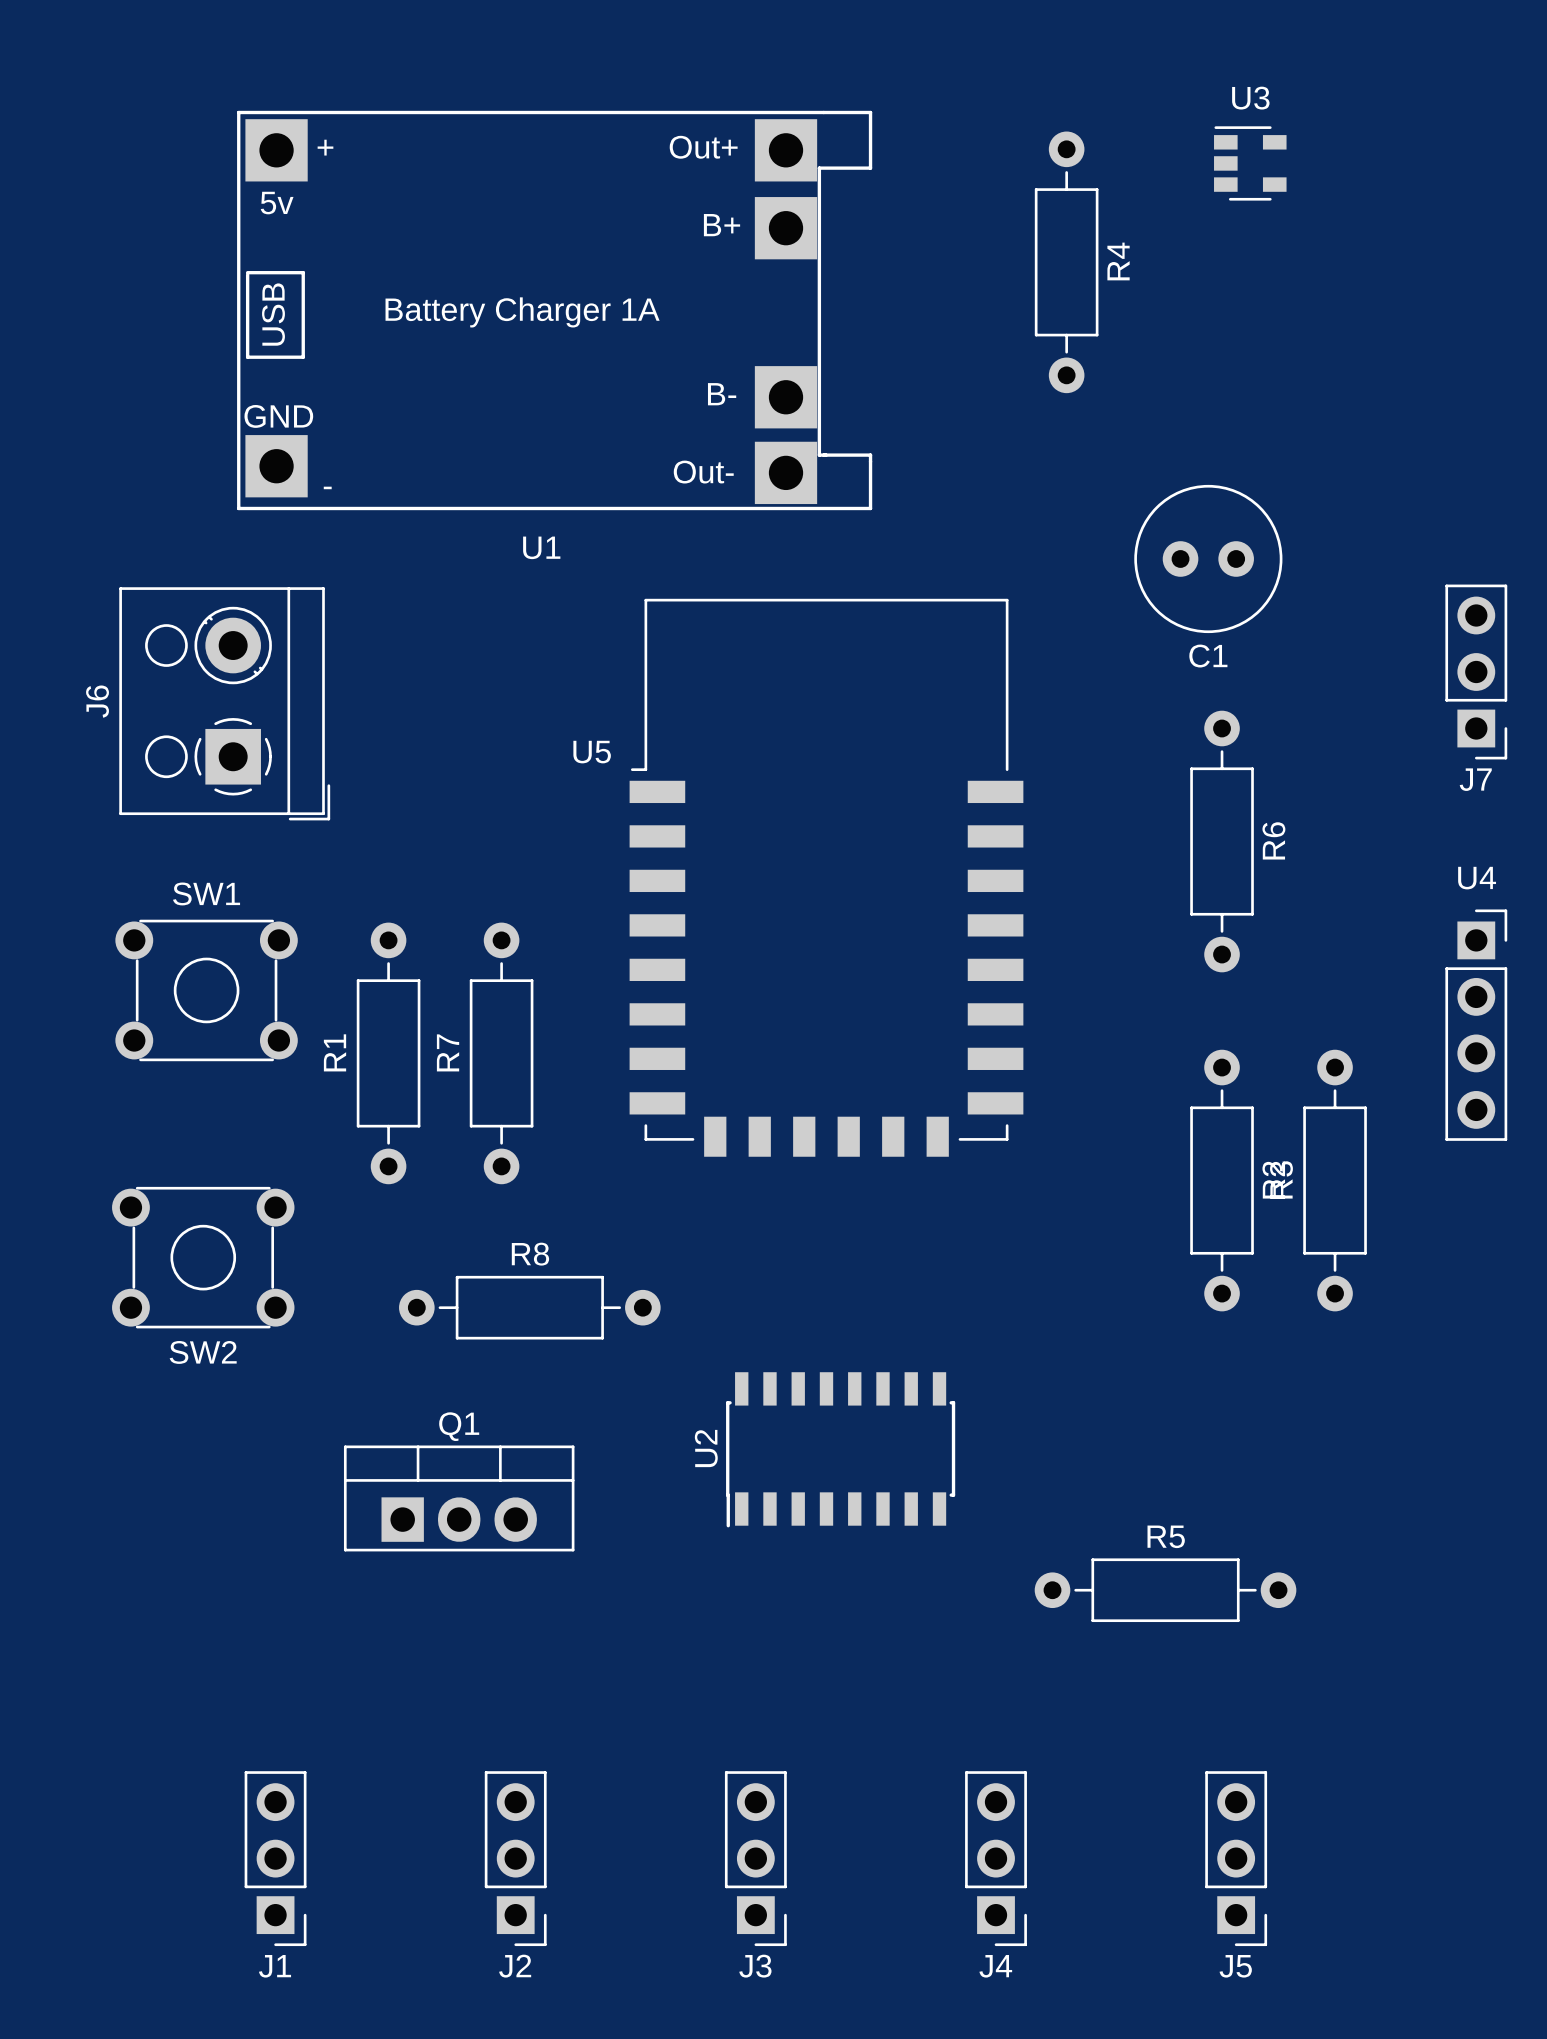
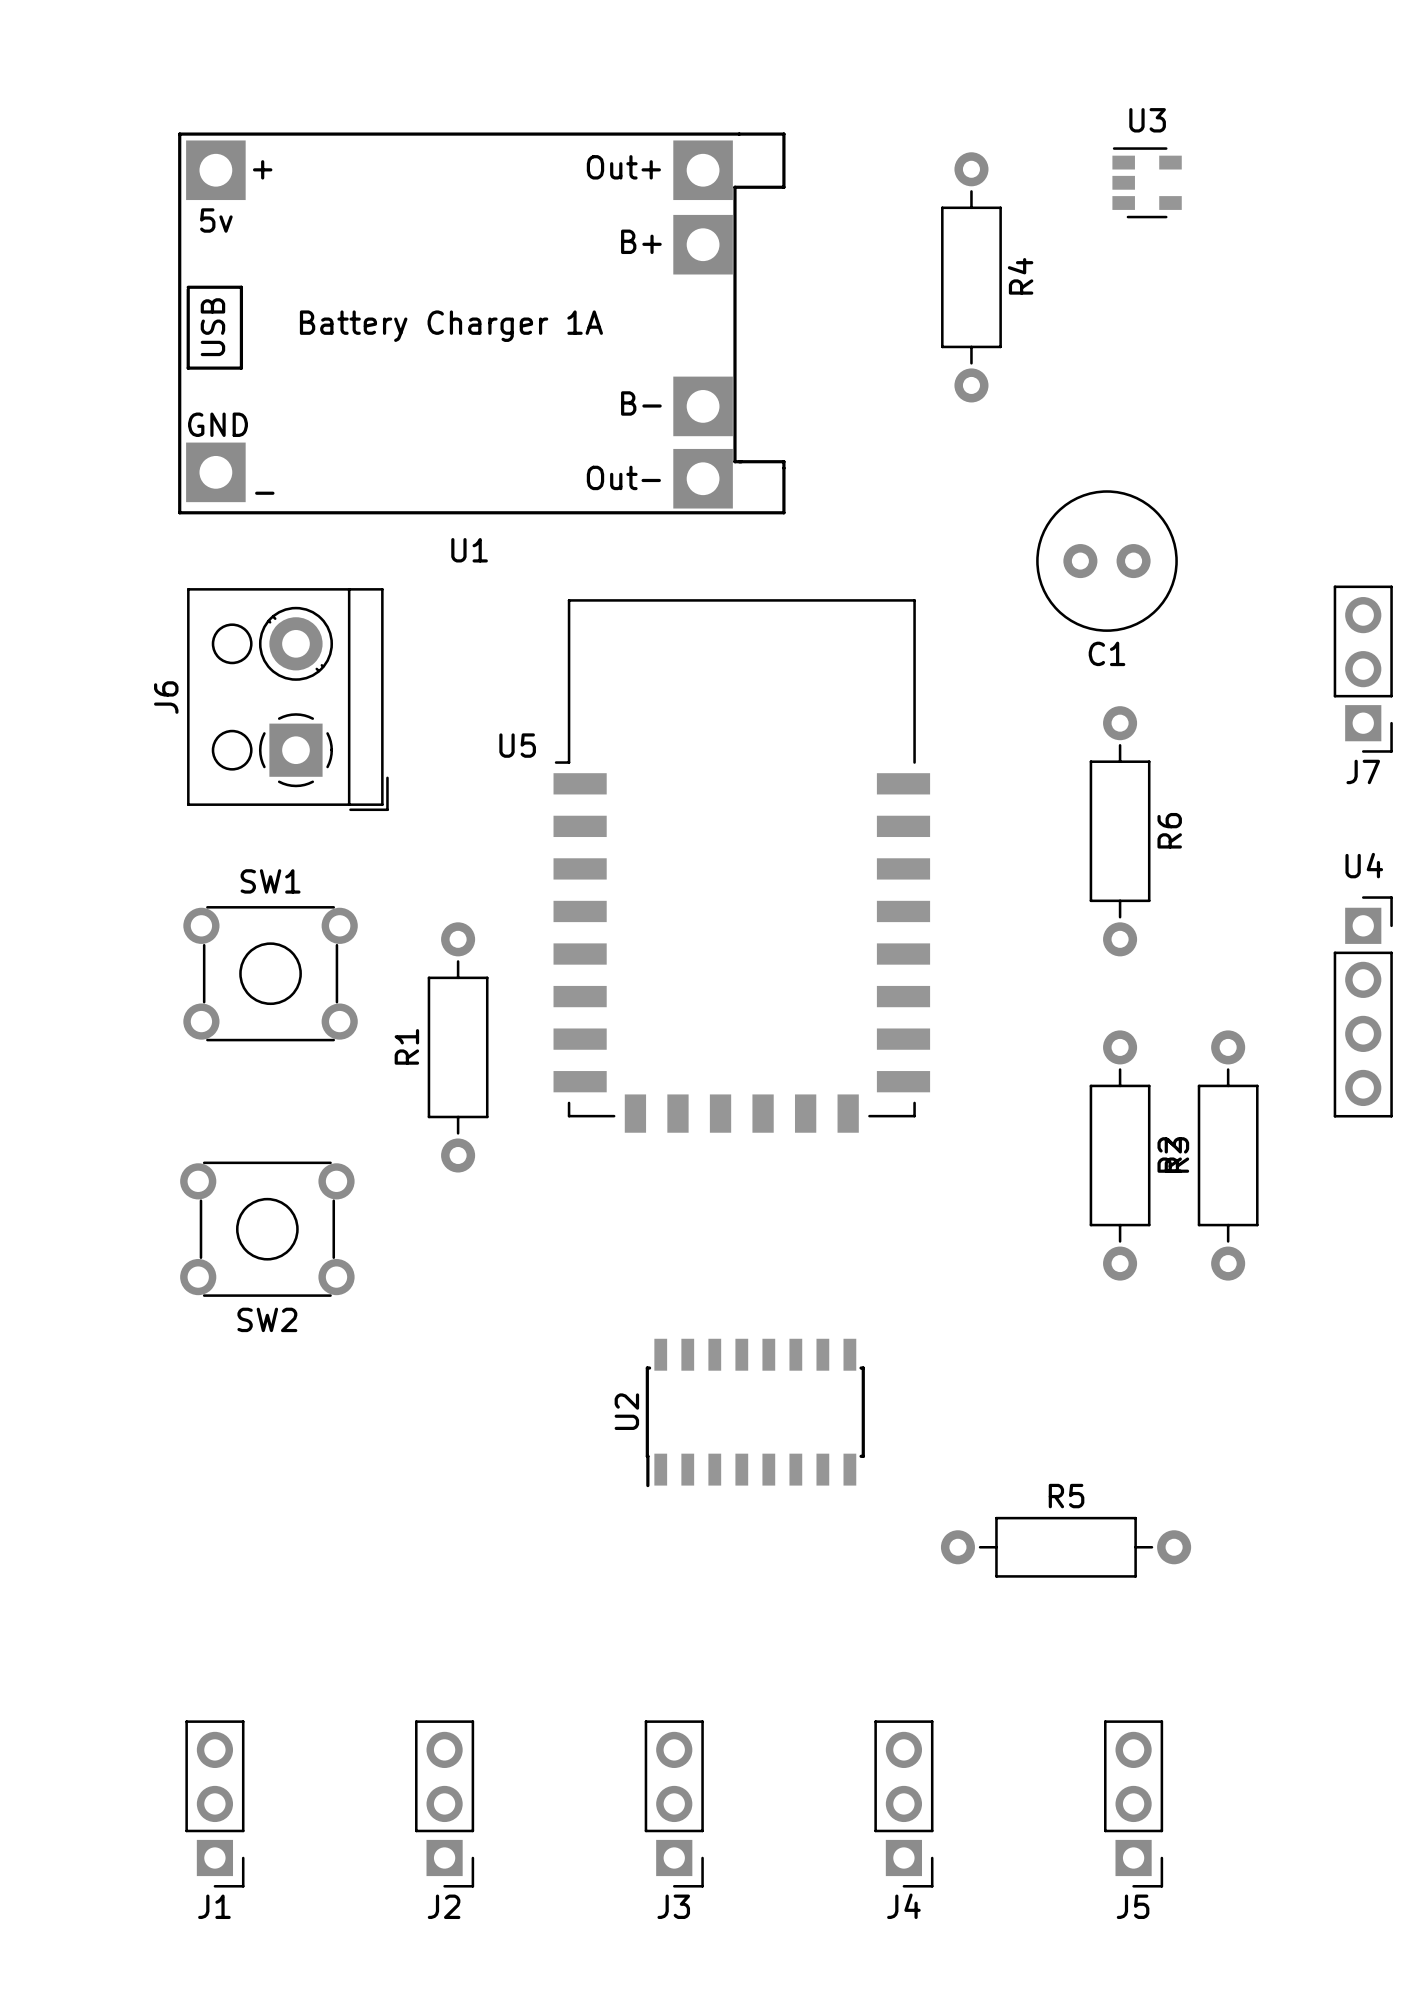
J6 position: (224, 703) -> (287, 699)
SW1 position: (206, 990) -> (270, 973)
R1 position: (388, 1053) -> (458, 1047)
R7: (501, 1053) -> none
SW2 position: (203, 1257) -> (267, 1229)
R8: (529, 1307) -> none
Q1: (459, 1498) -> none

